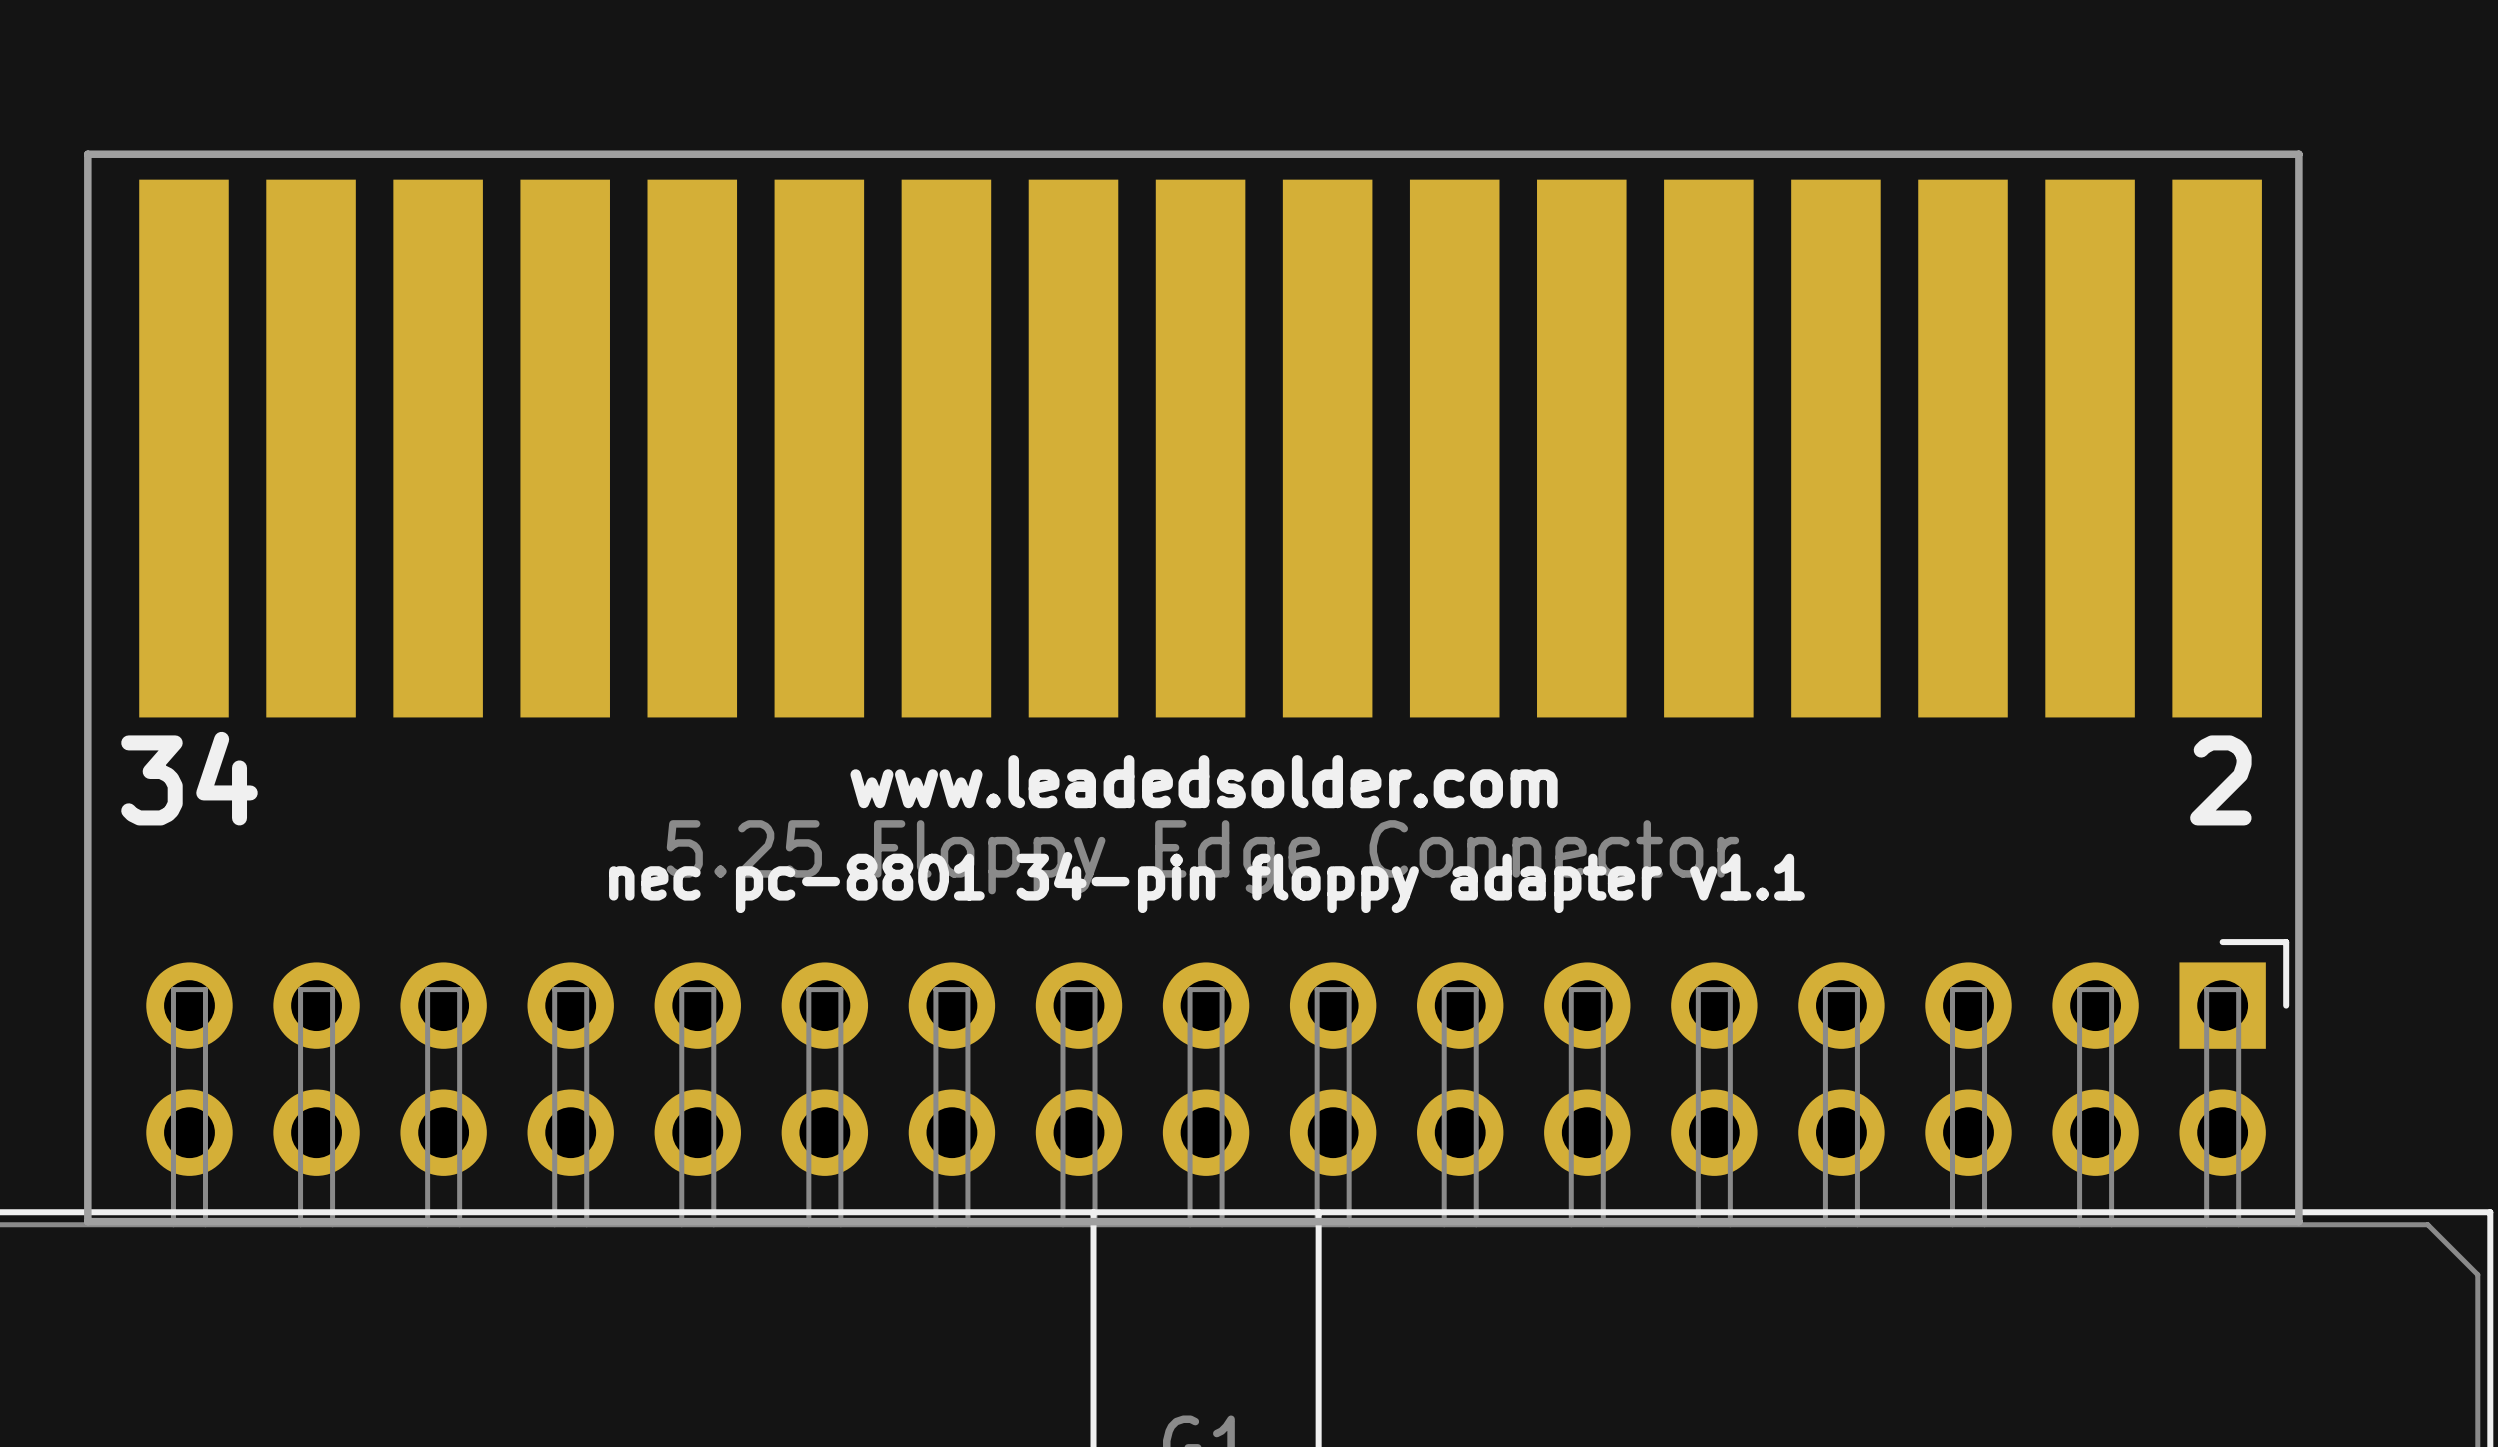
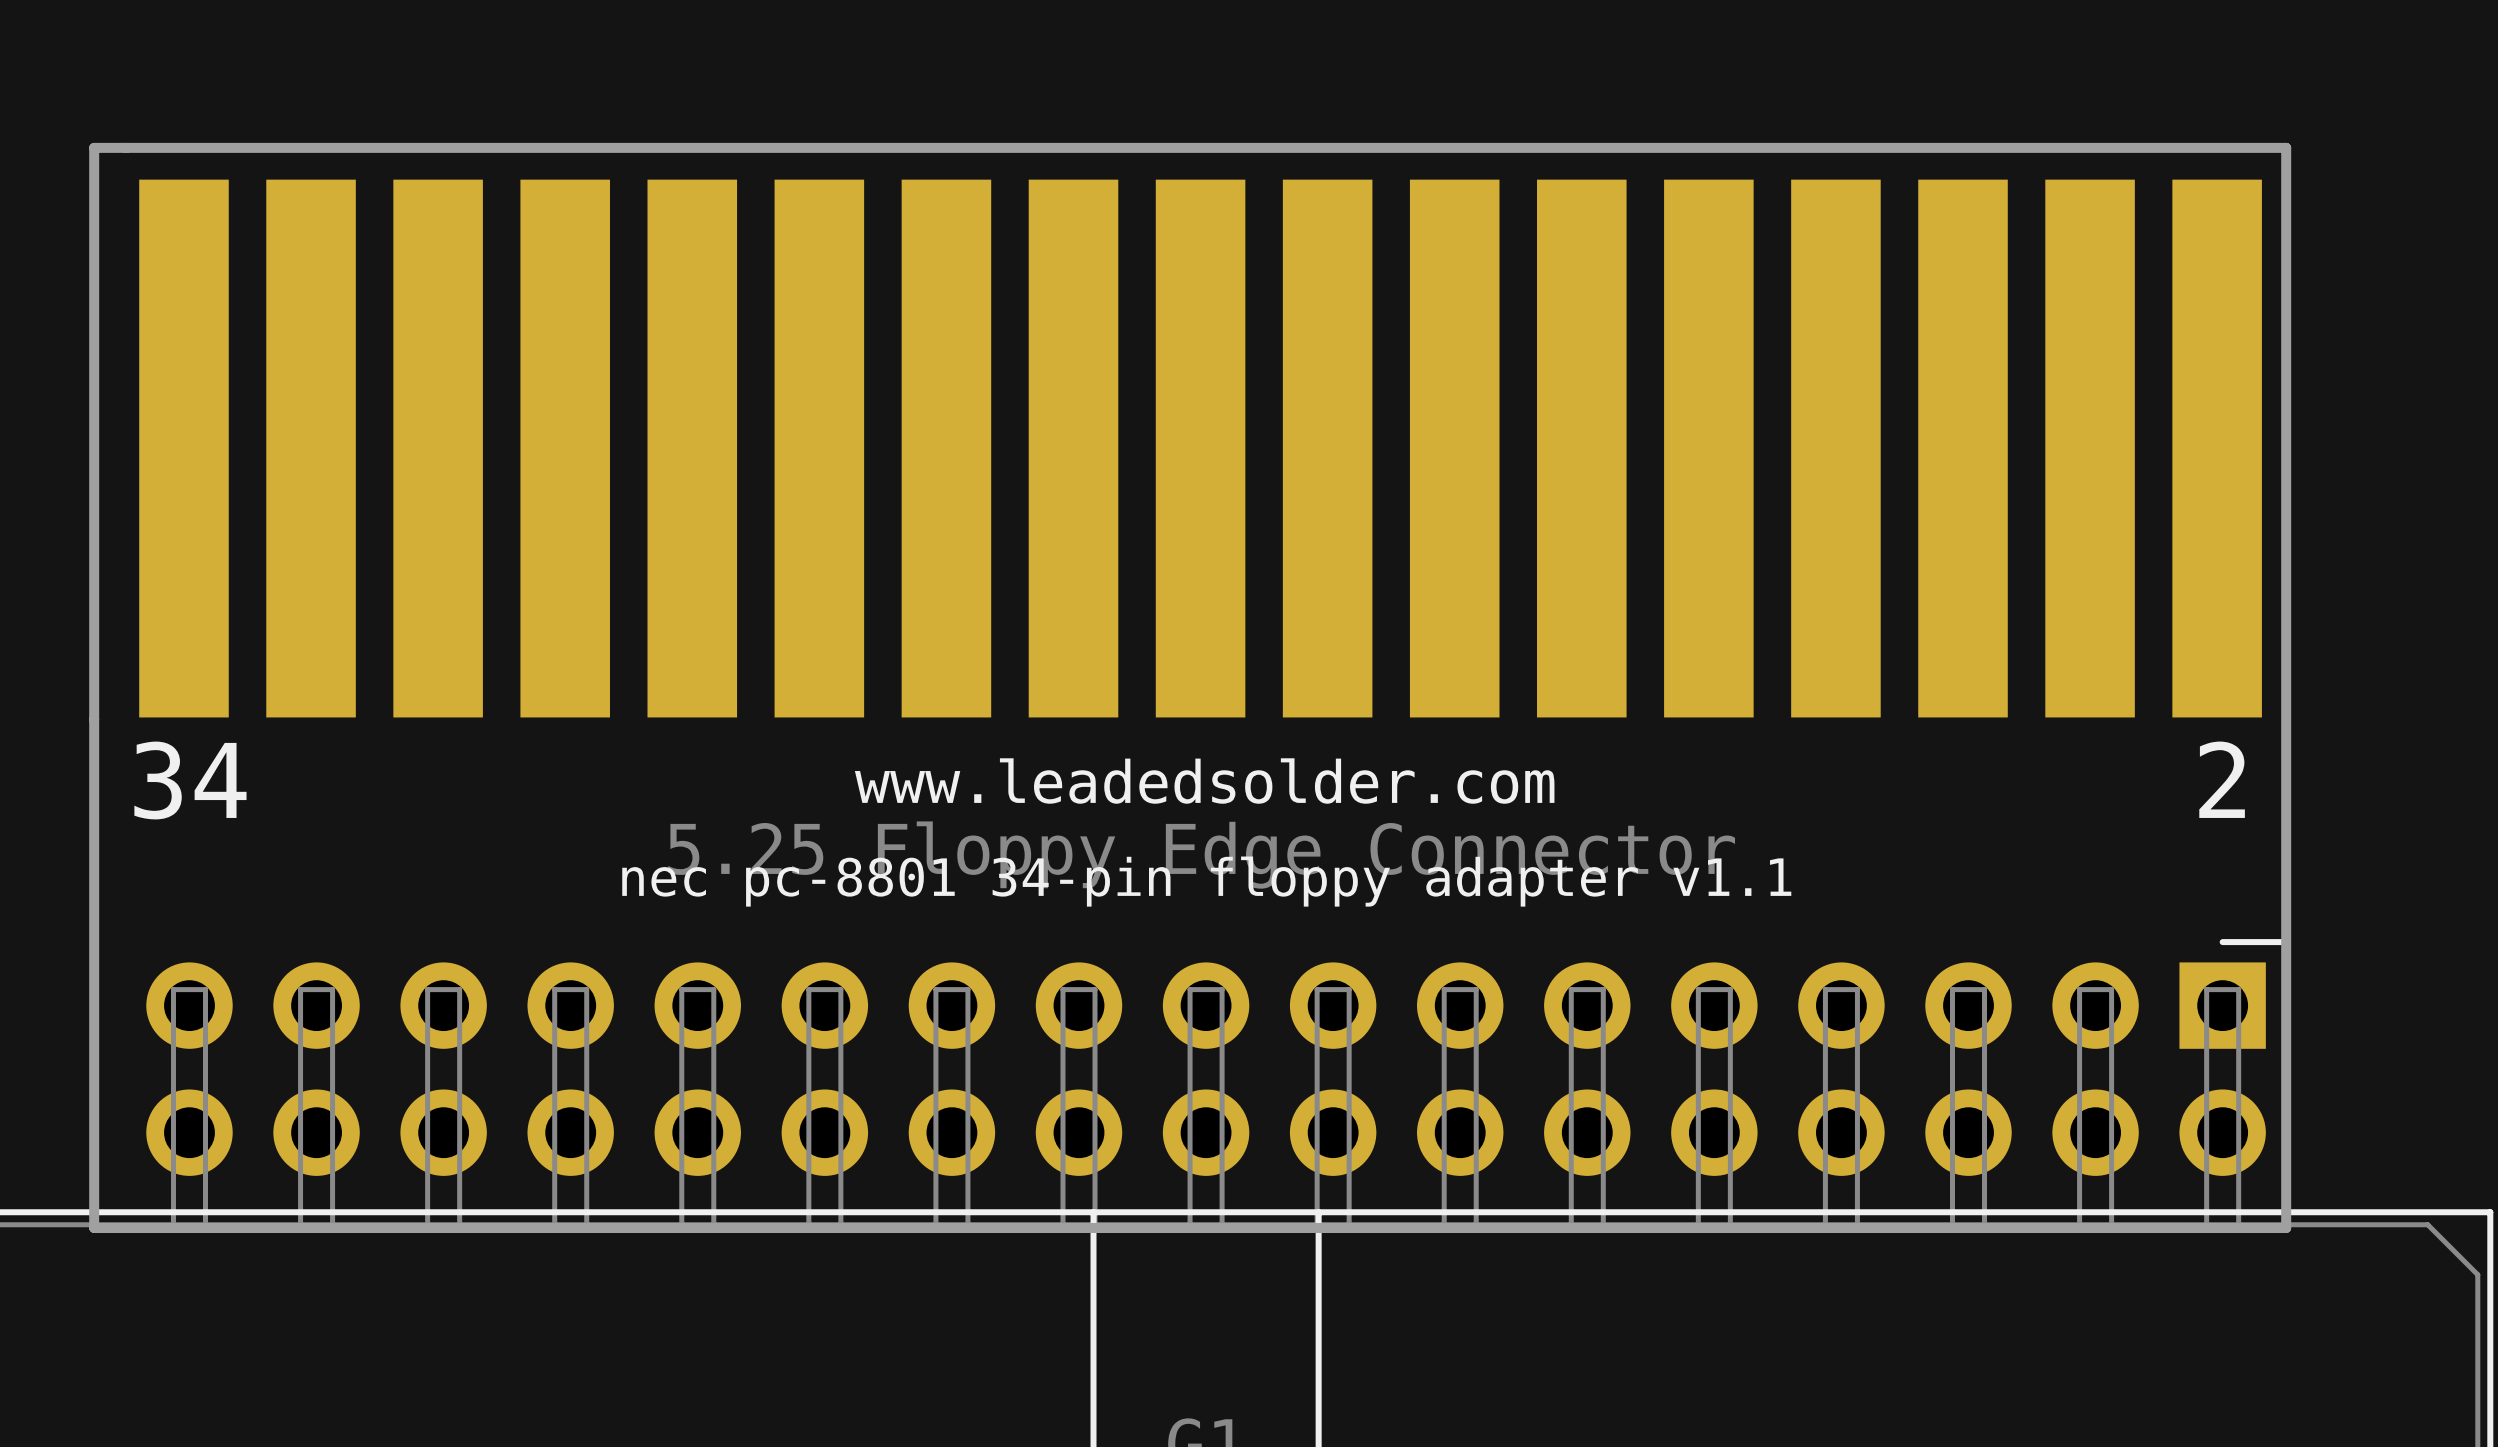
board edge: (87, 154) (87, 1221) (2298, 1221) (2298, 154) (87, 154) -> (94, 147) (94, 1227) (2286, 1227) (2286, 147) (94, 147)

